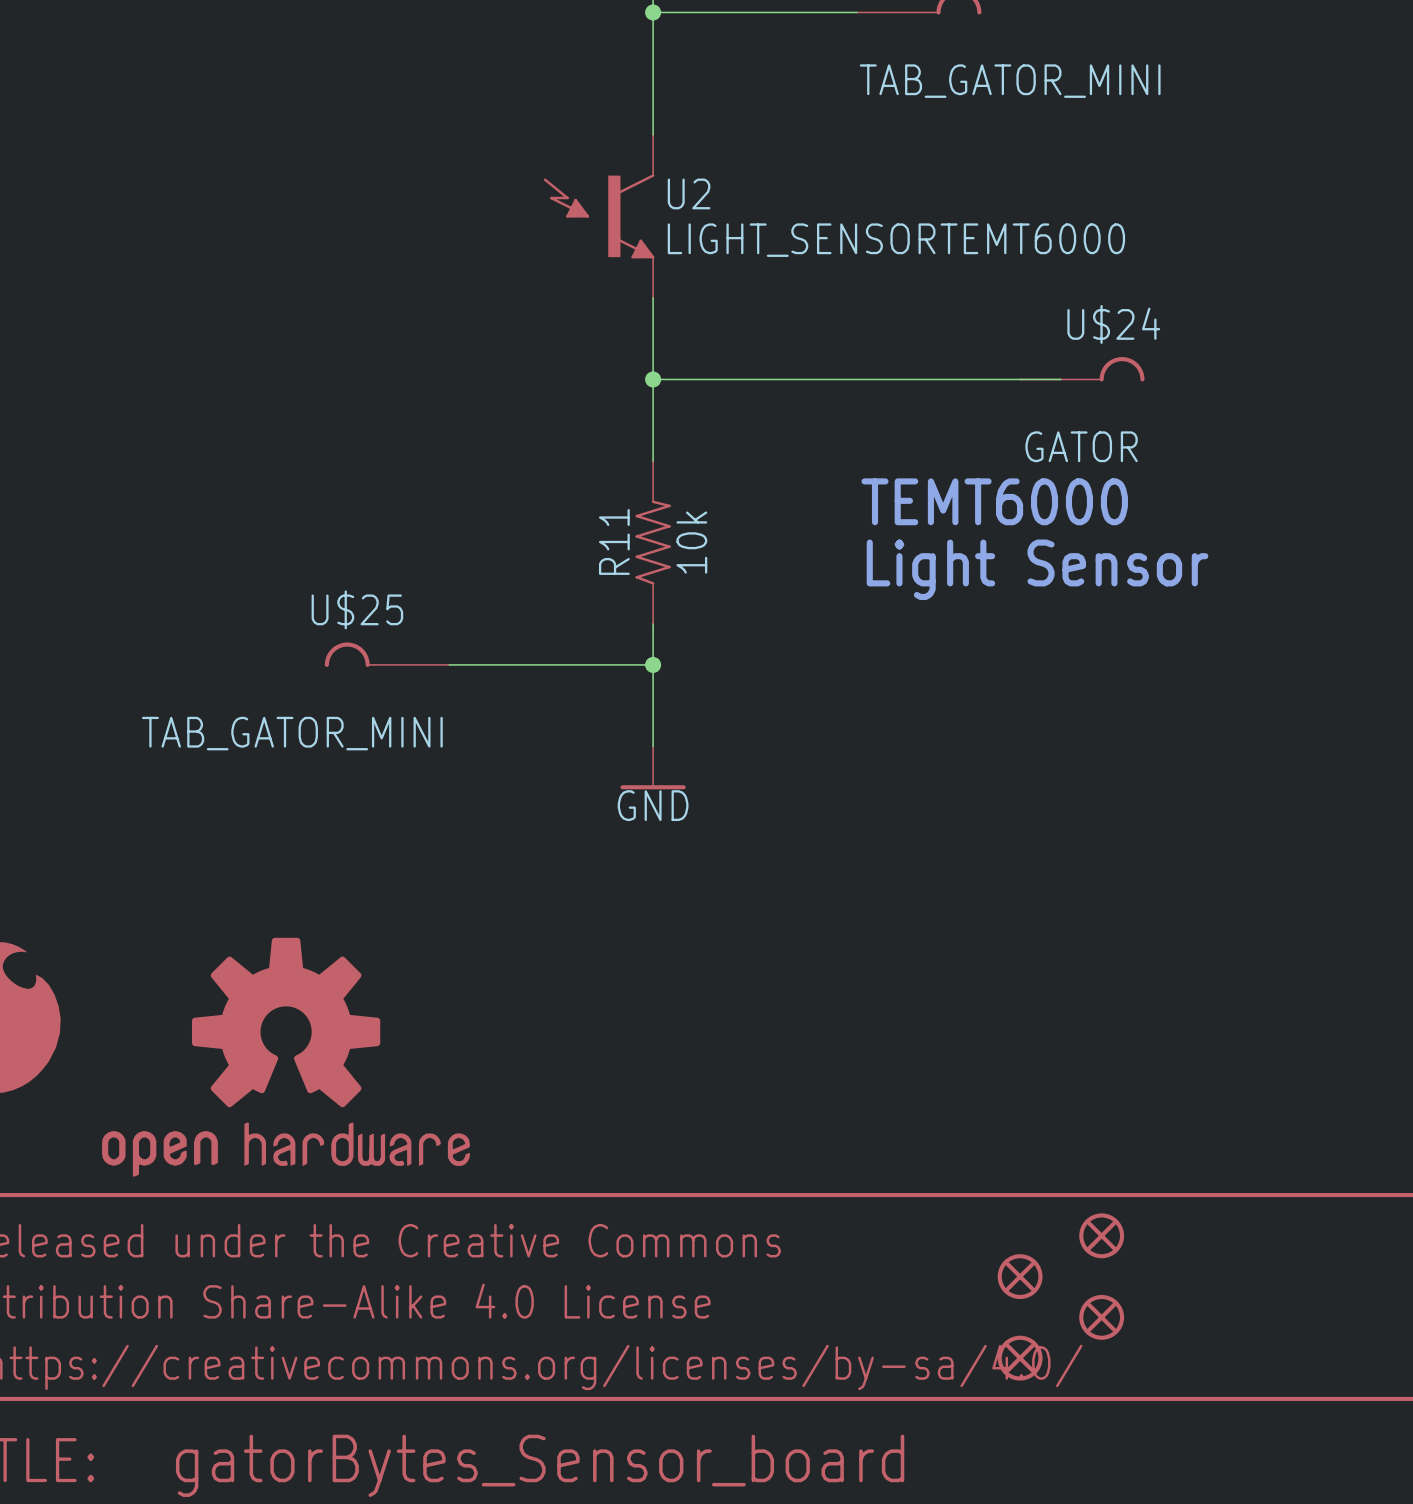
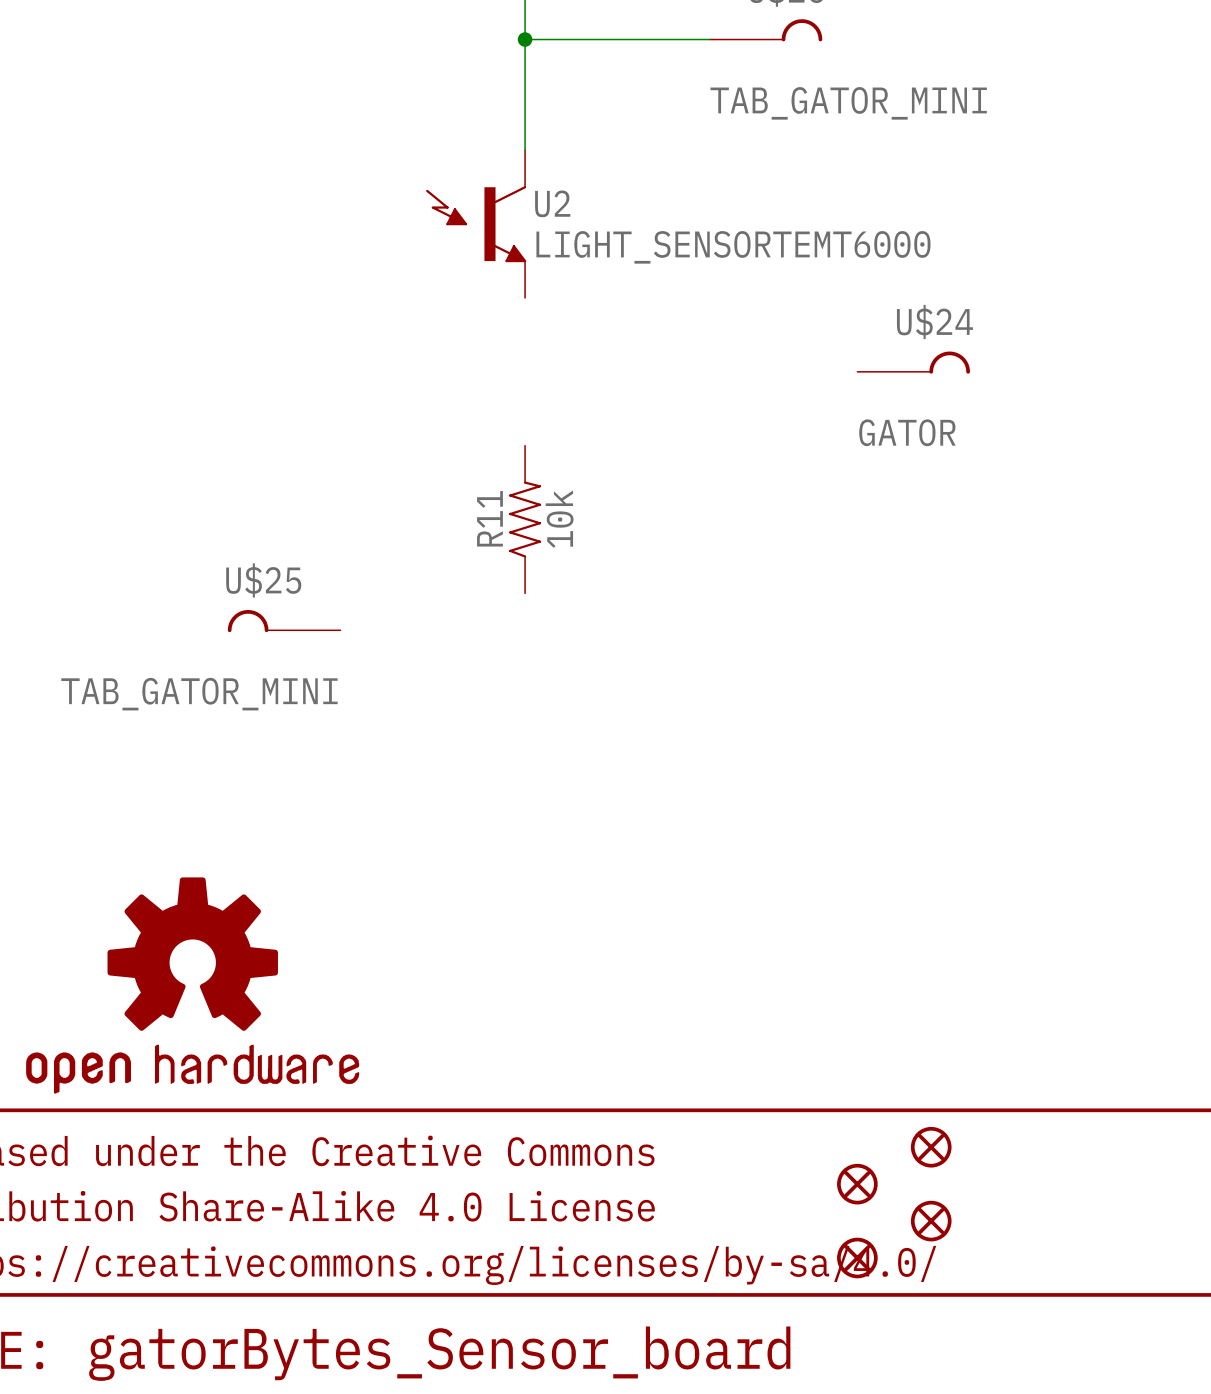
wire: (653, 297) (653, 461) -> none
wire: (653, 379) (1060, 379) -> none
junction: (653, 379) -> none
text: TEMT6000 (994, 501) -> none
text: Light Sensor (1037, 569) -> none
wire: (653, 624) (653, 746) -> none
wire: (449, 664) (653, 664) -> none
junction: (653, 664) -> none
power symbol: GND (653, 767) -> none

